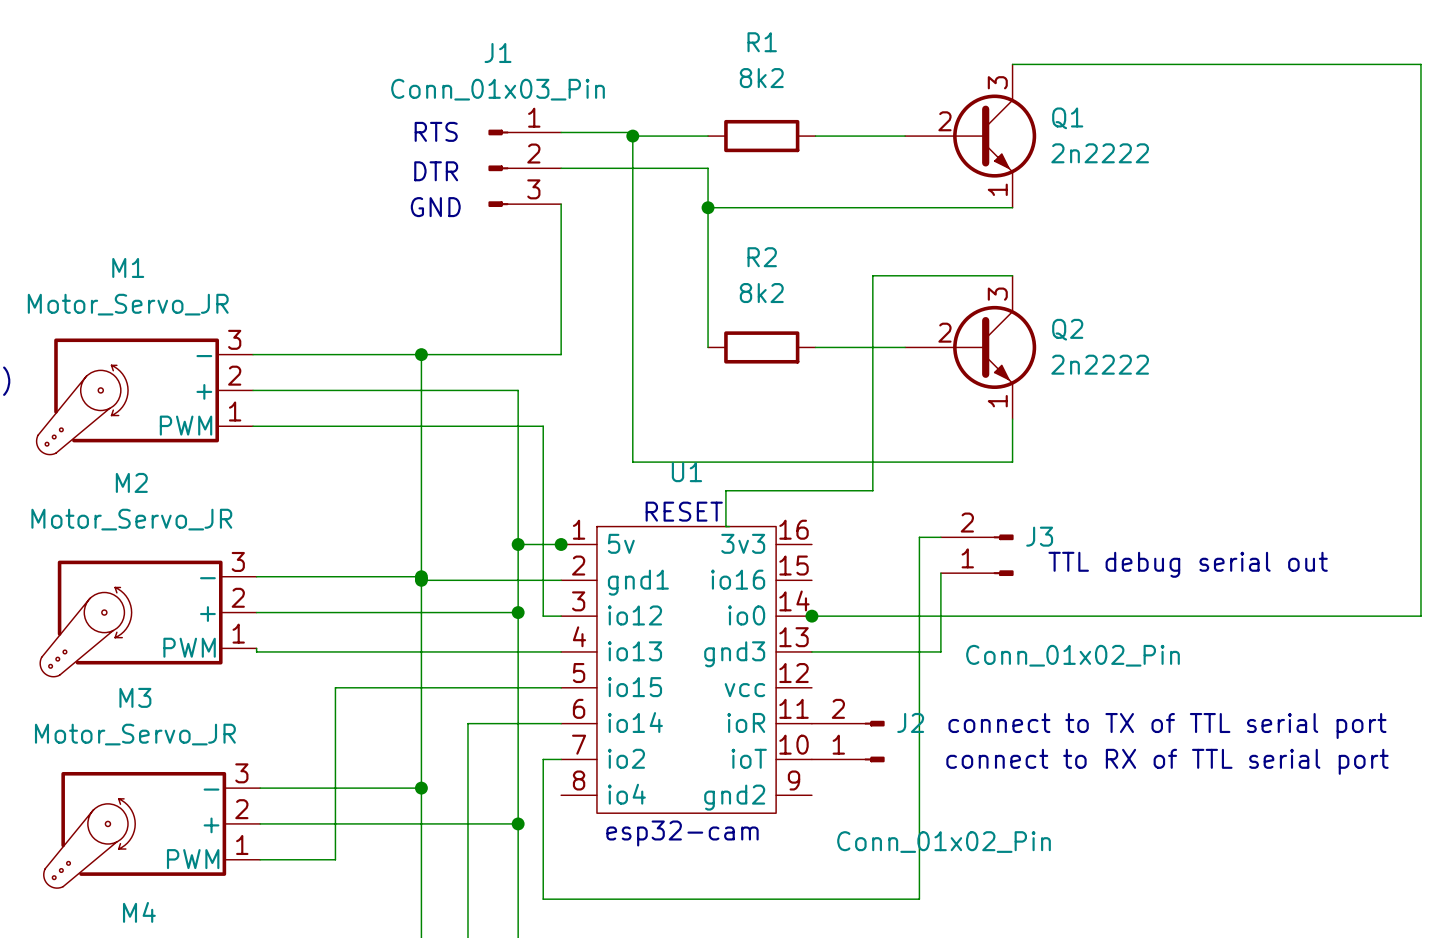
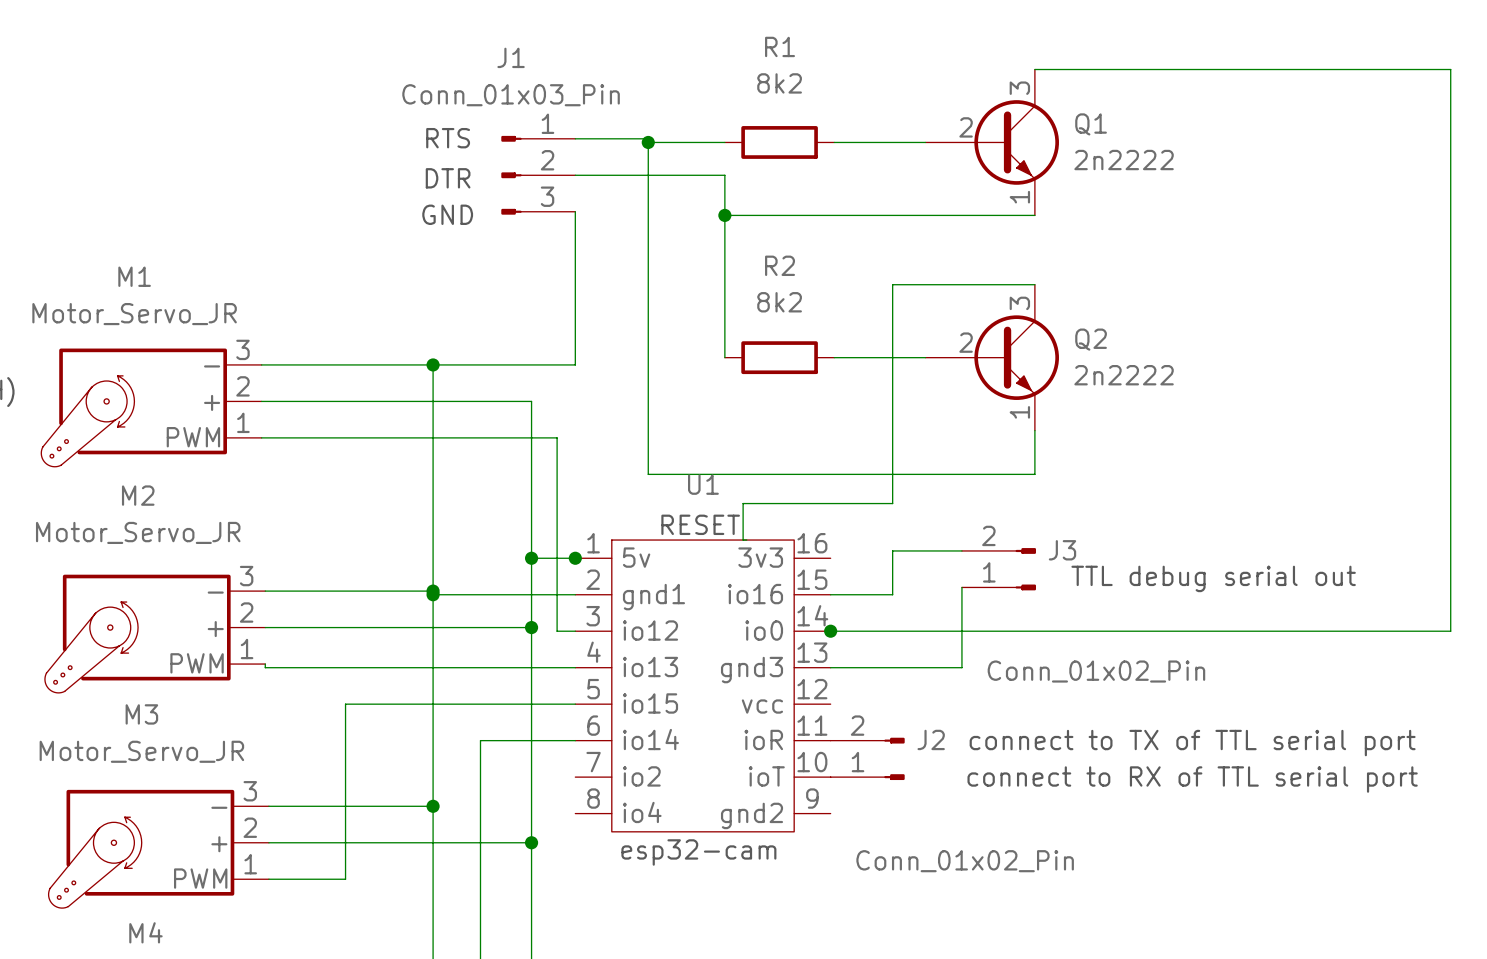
wire: (919, 537) (919, 899) (543, 899) (543, 759) (561, 759) -> (940, 550) (892, 550) (892, 594) (830, 594)

